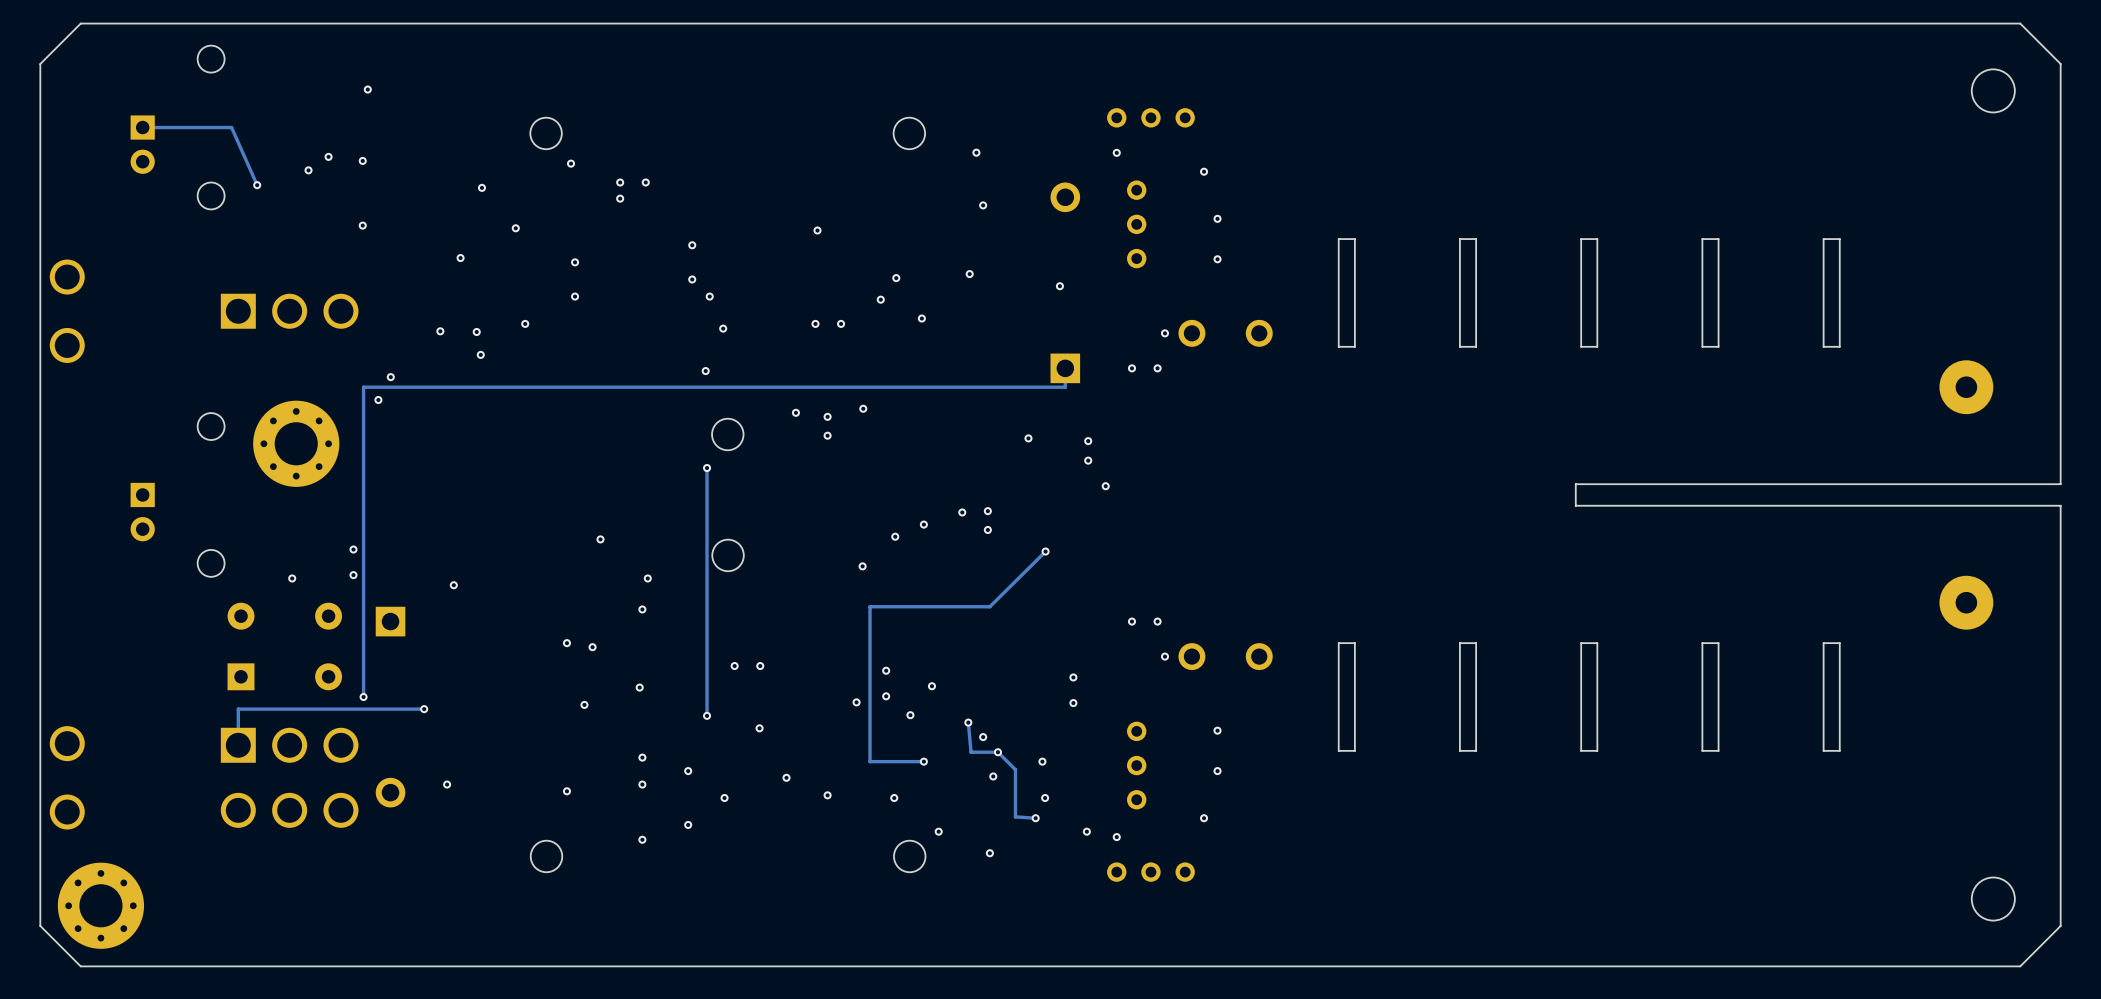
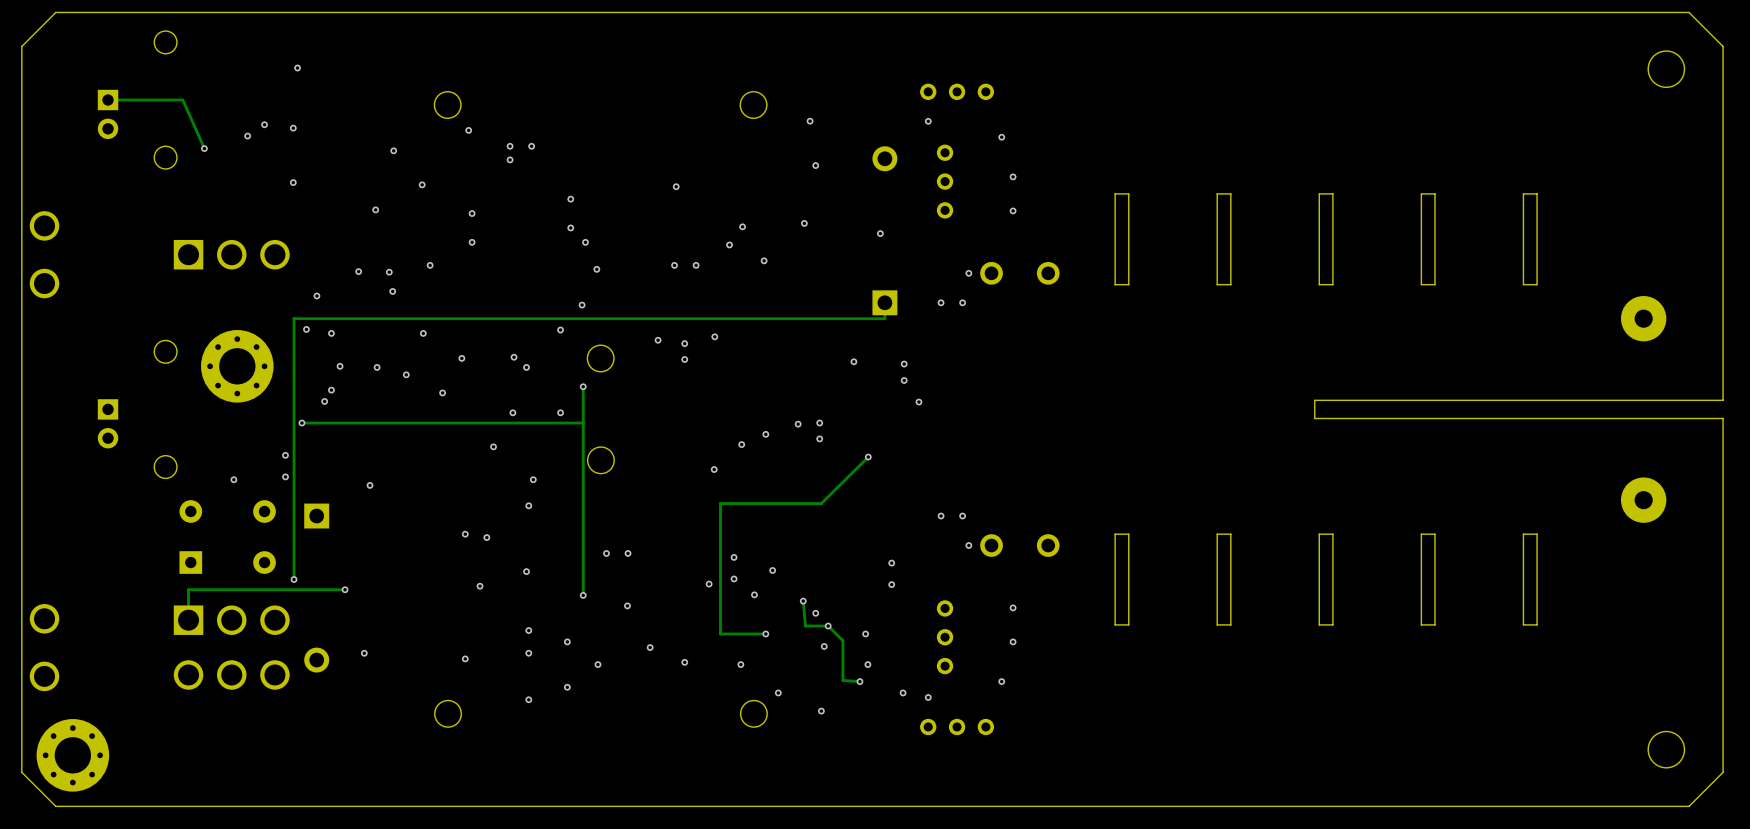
via: none -> (316, 296)
via: (390, 377) -> none
via: none -> (560, 330)
via: none -> (331, 333)
via: none -> (423, 333)
via: none -> (514, 357)
via: none -> (461, 358)
via: none -> (340, 366)
via: none -> (377, 367)
via: none -> (526, 367)
via: none -> (406, 374)
via: none -> (331, 390)
via: none -> (442, 392)
via: none -> (324, 401)
via: none -> (512, 412)
via: none -> (560, 412)
via: none -> (301, 423)
track: none -> (583, 423) (301, 423)

